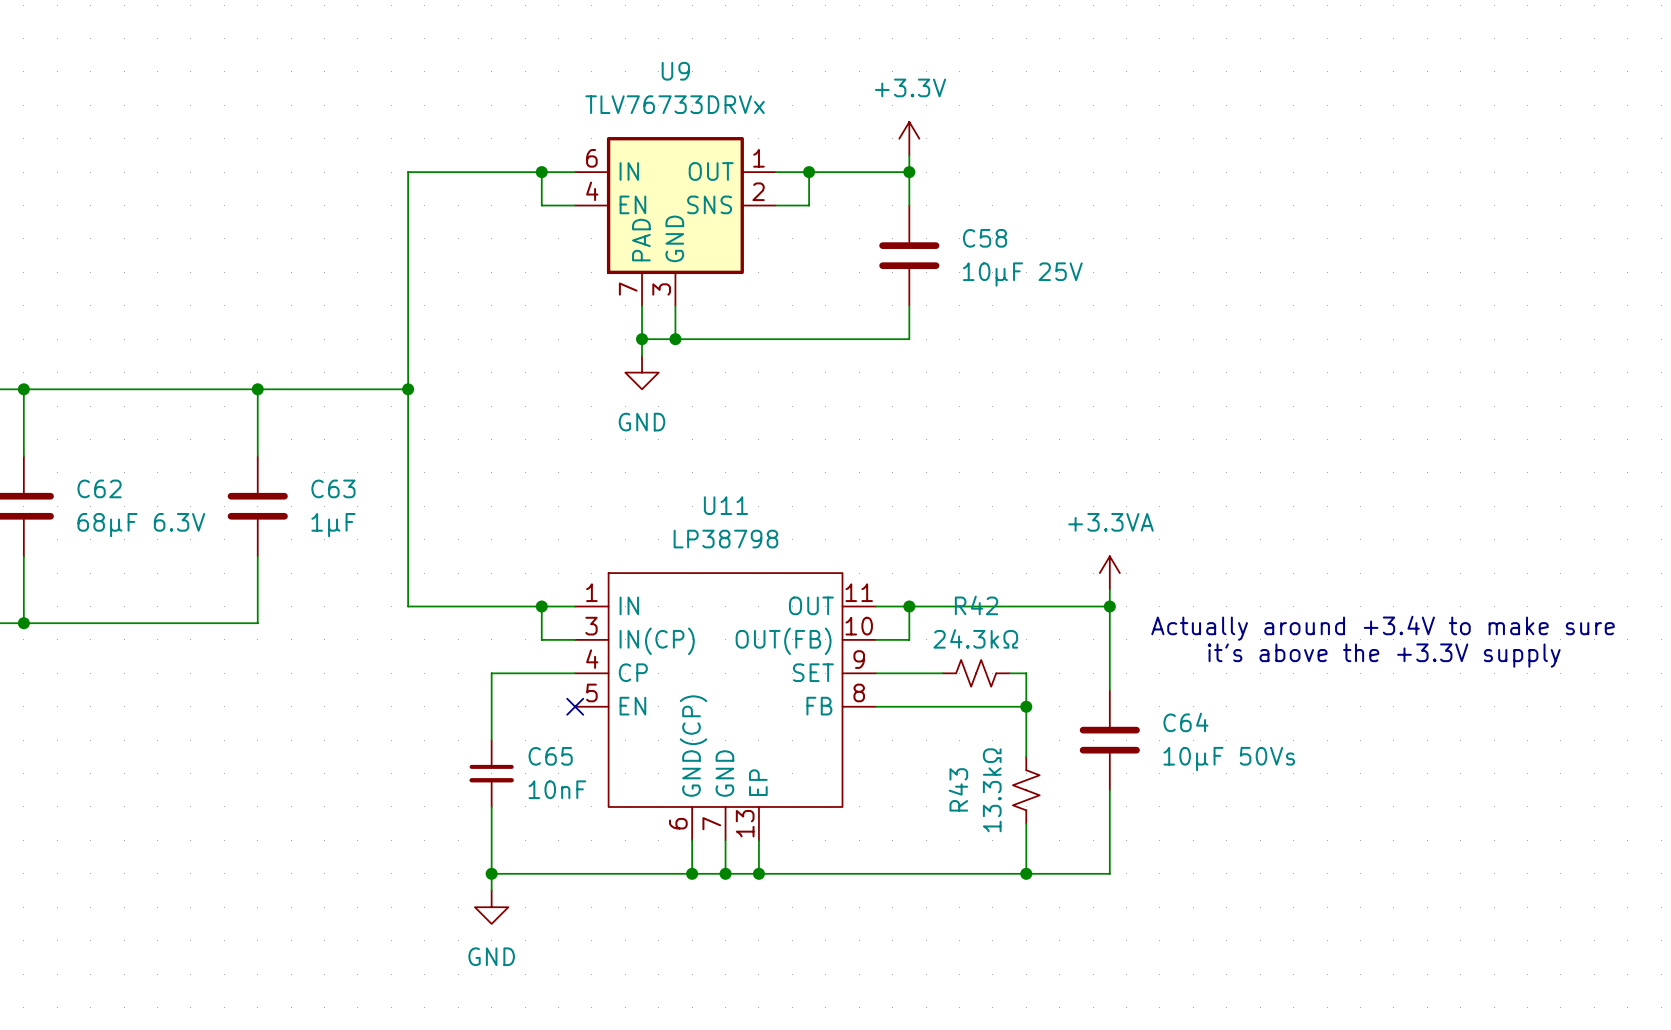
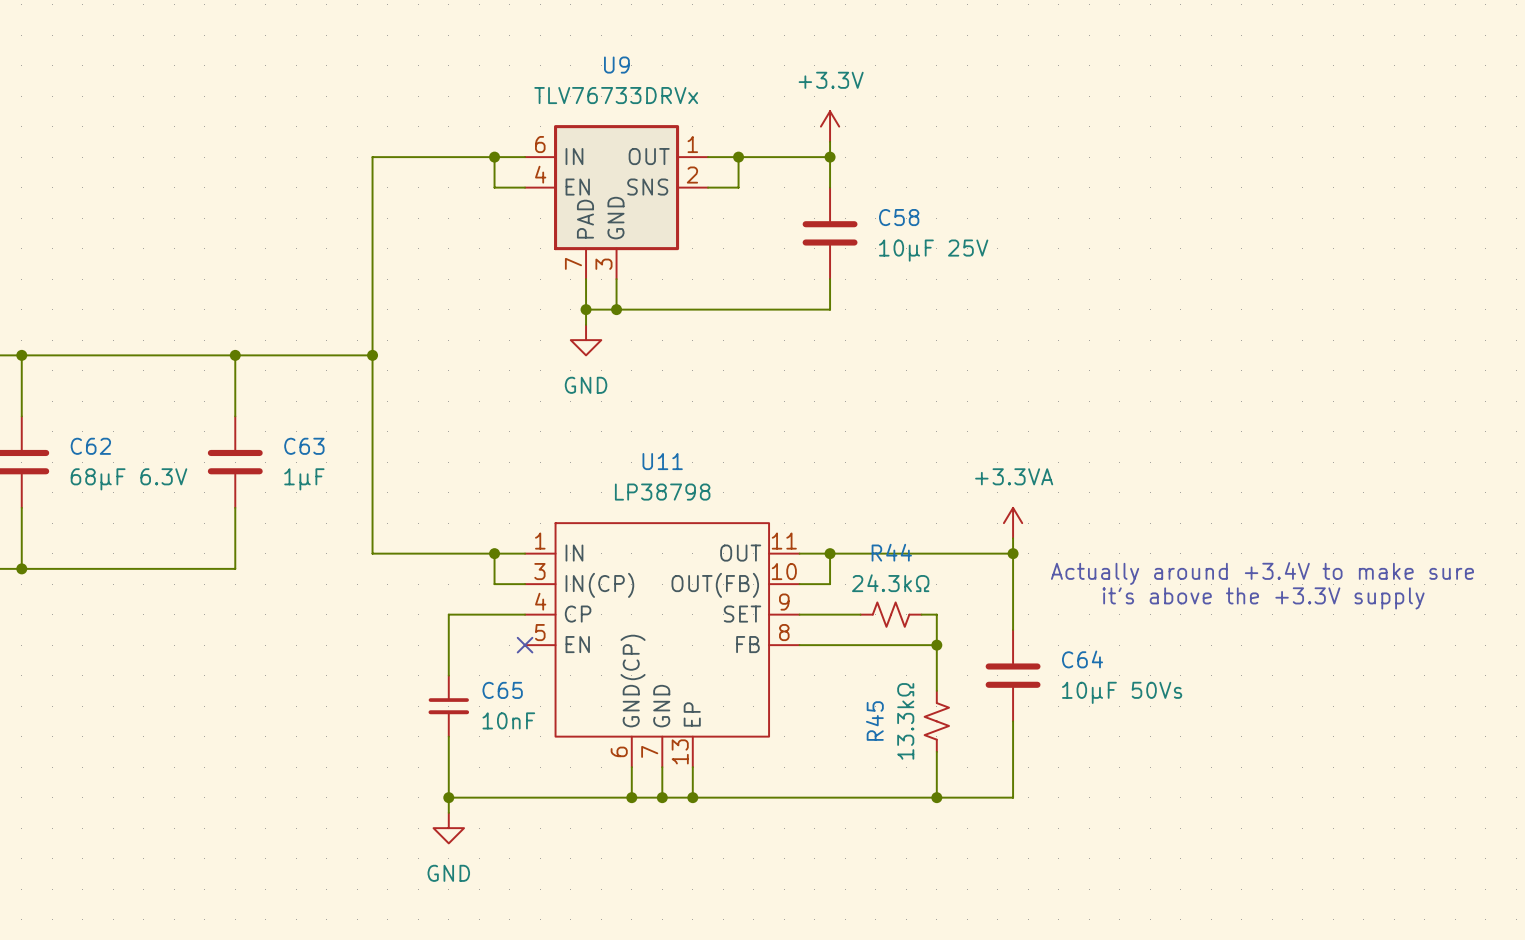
R42 name: R42 (976, 605) -> R44 (891, 552)
R43 name: R43 (958, 789) -> R45 (874, 721)

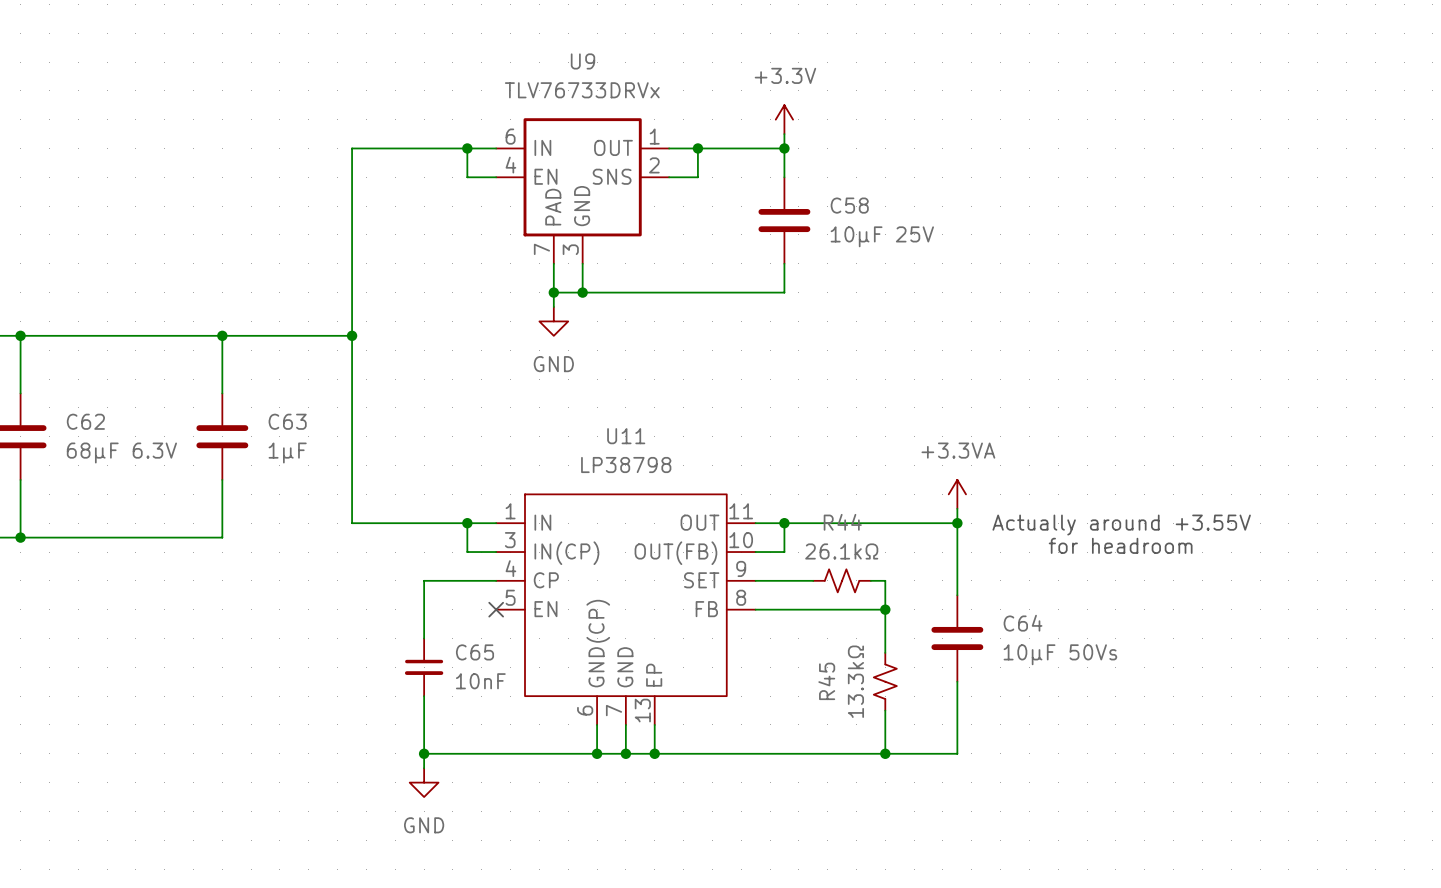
text: Actually around +3.4V to make sure (1262, 573) -> Actually around +3.55V (1121, 525)
text: none -> for headroom (1120, 545)
R44 value: 24.3kΩ (890, 583) -> 26.1kΩ (841, 551)
text: it's above the +3.3V supply (1263, 598) -> none

